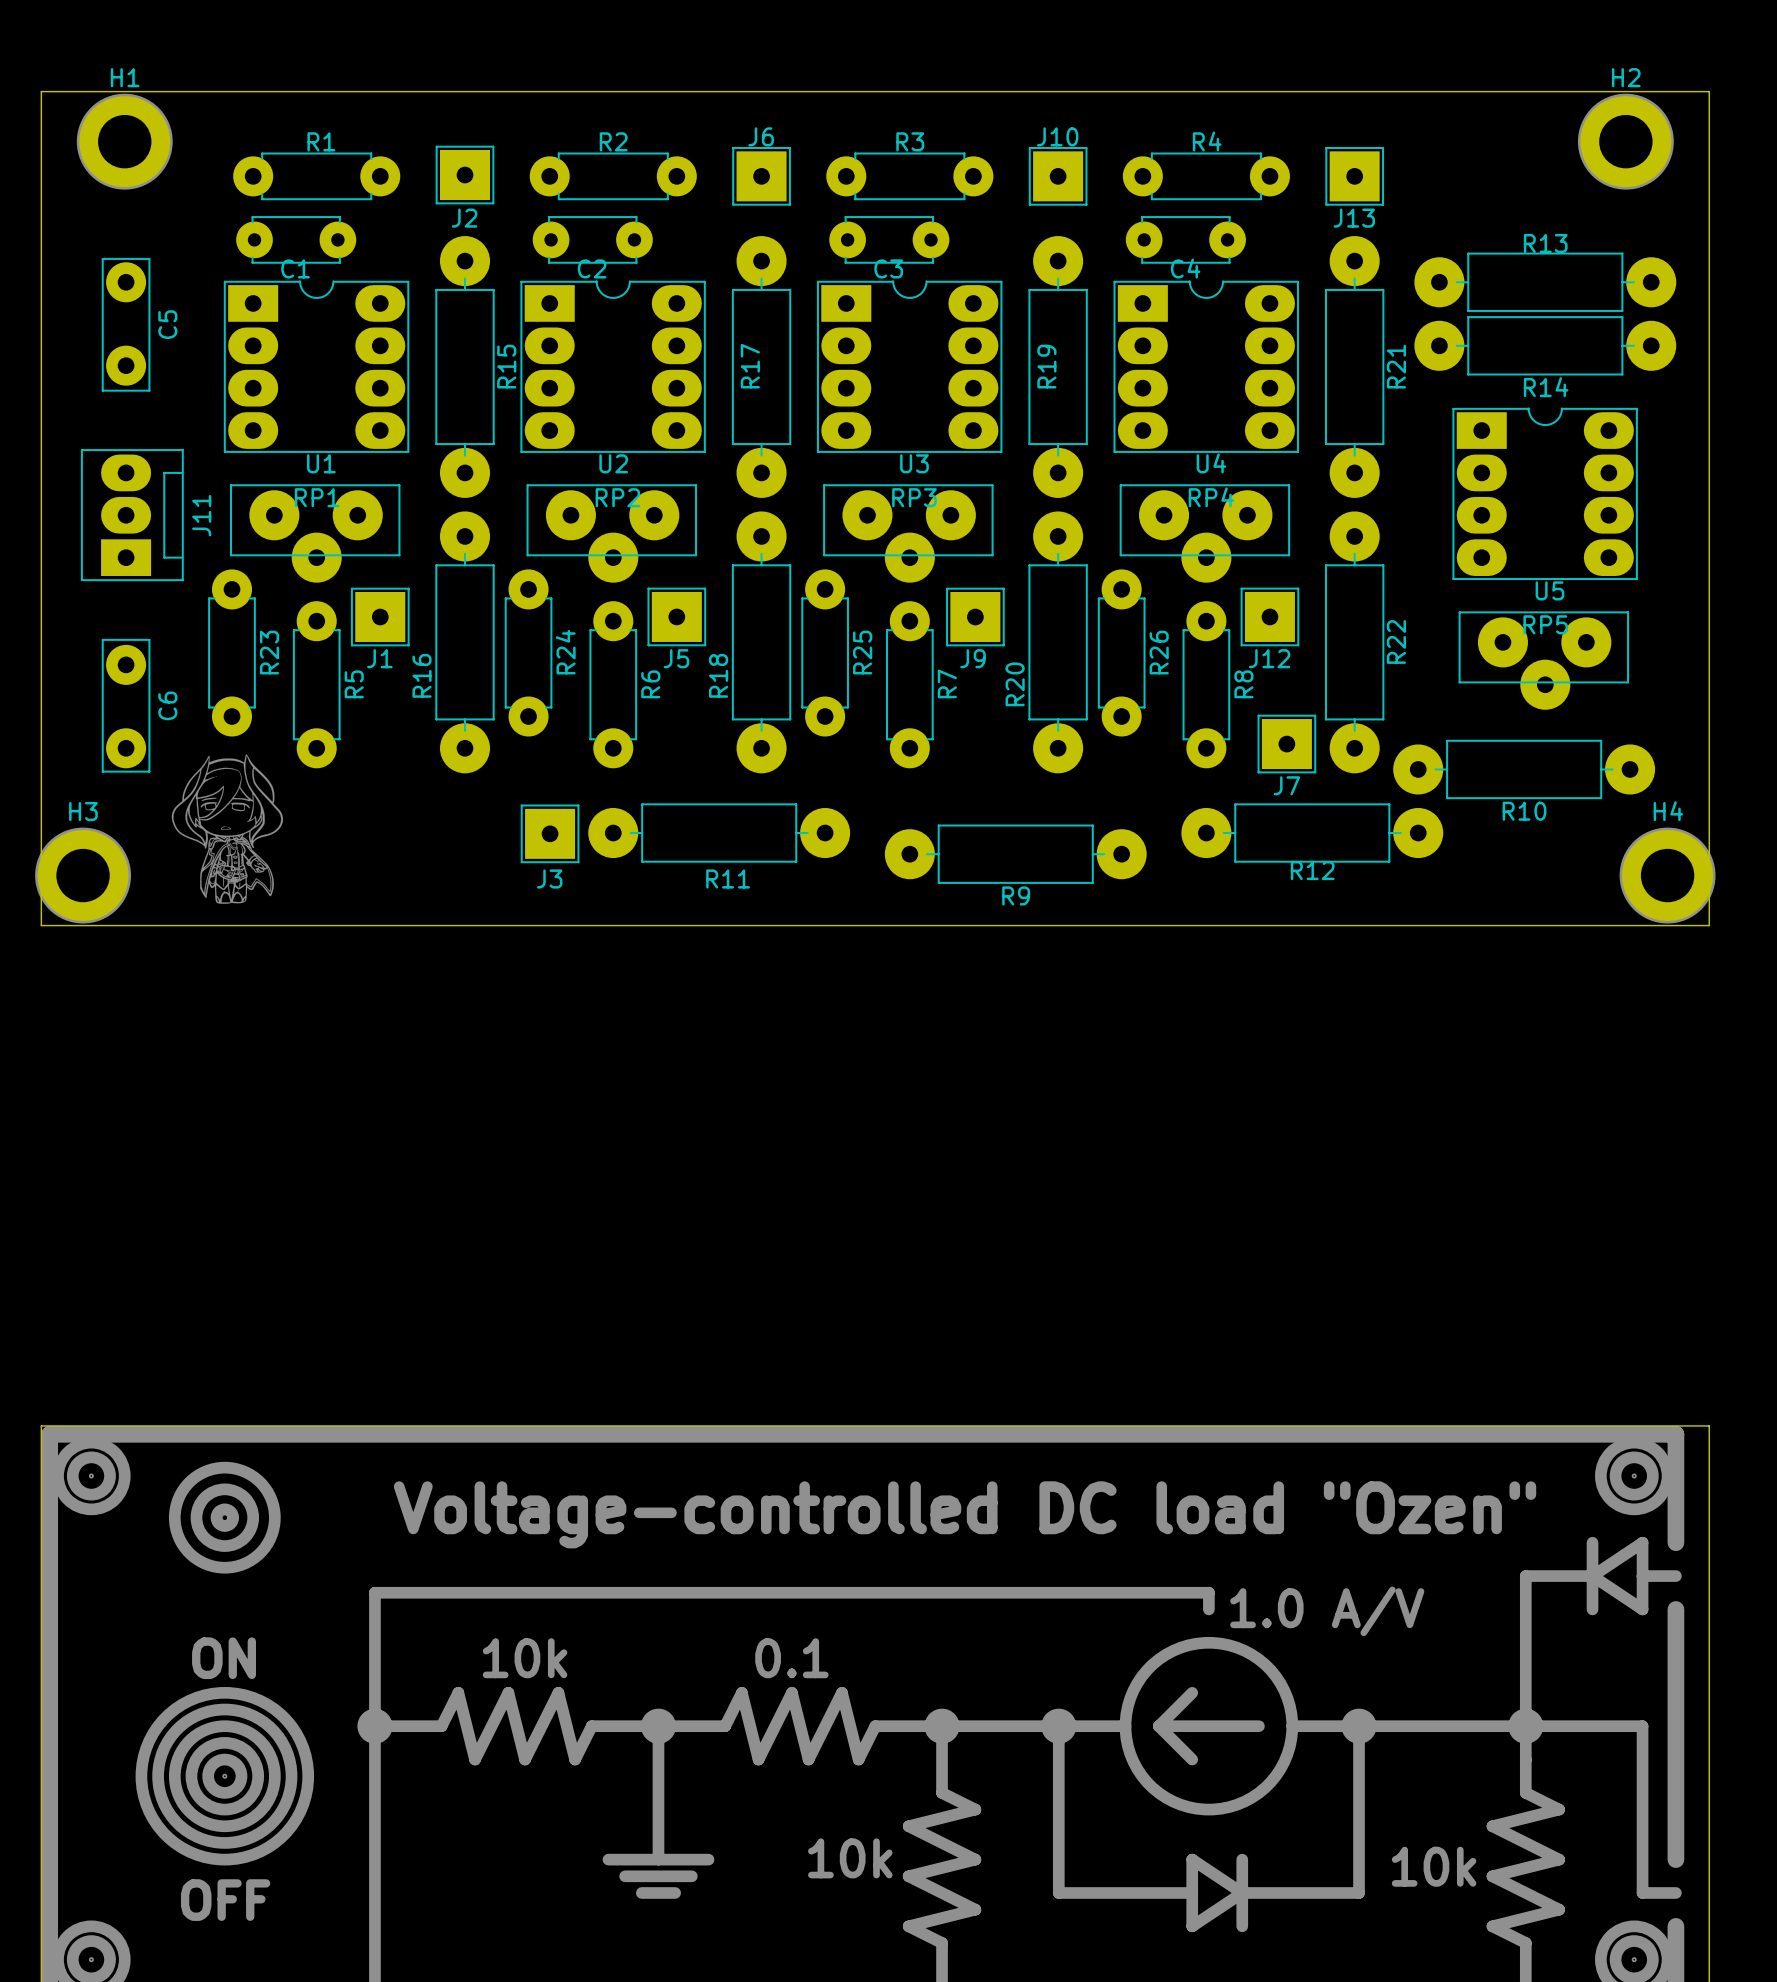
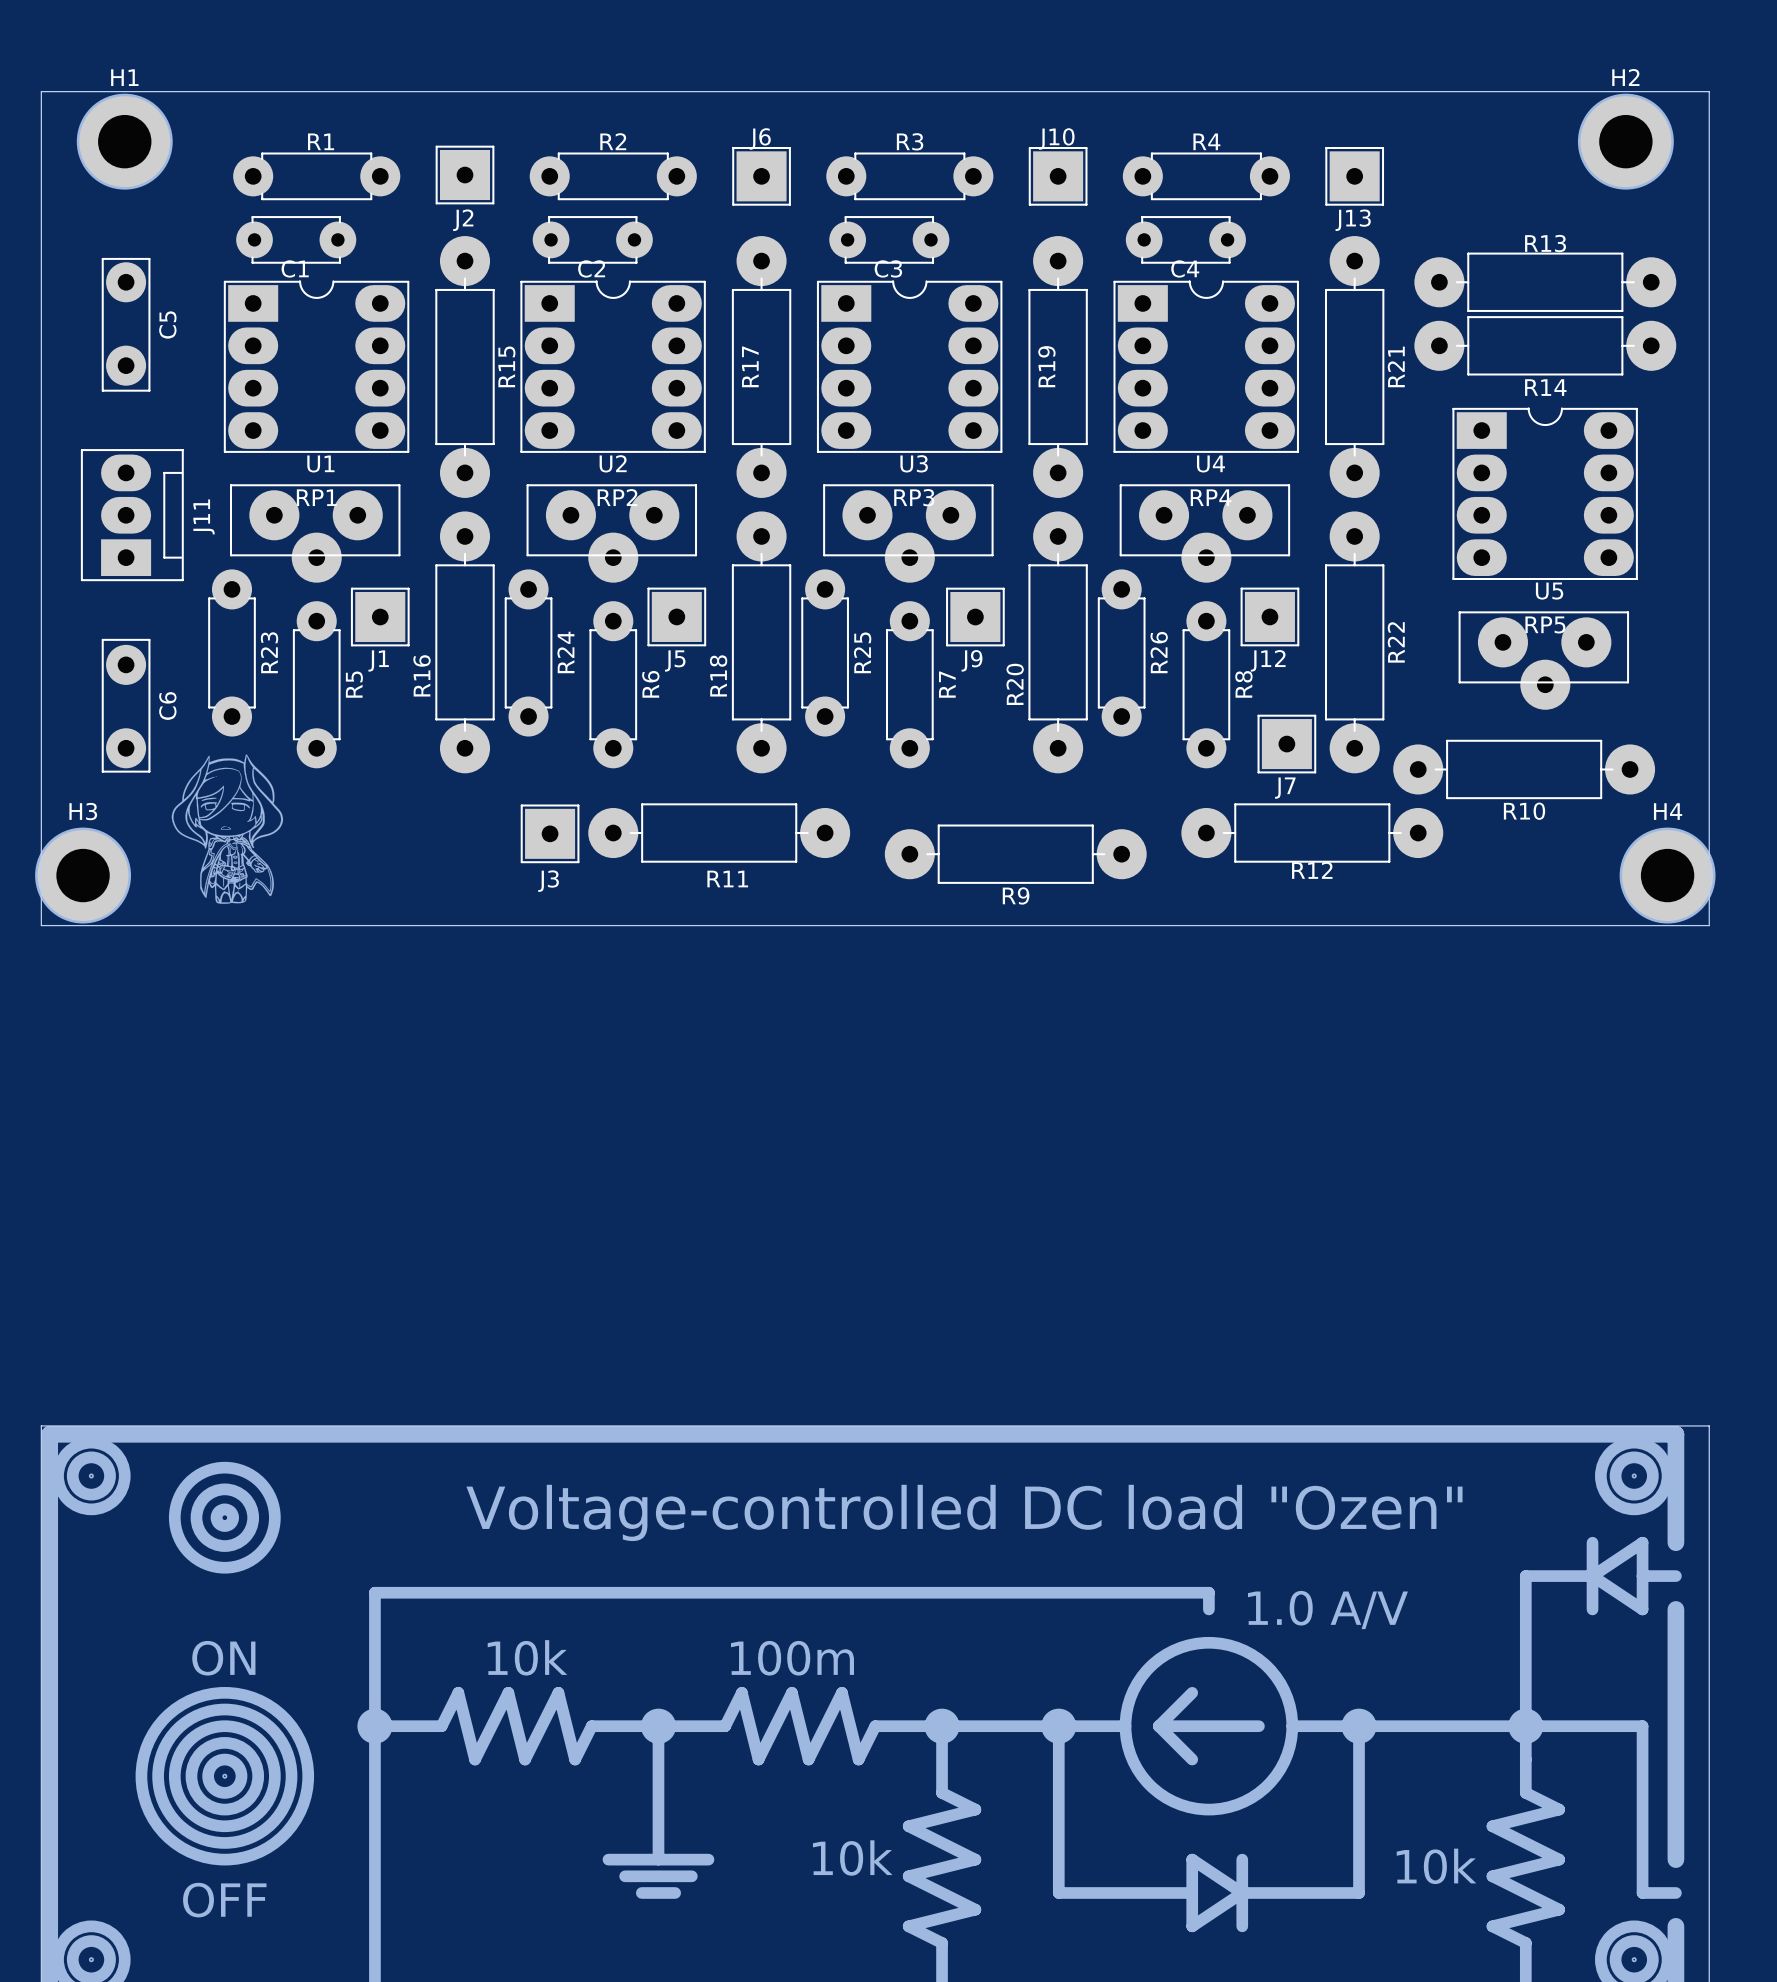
text: 0.1 (791, 1658) -> 100m (792, 1658)

